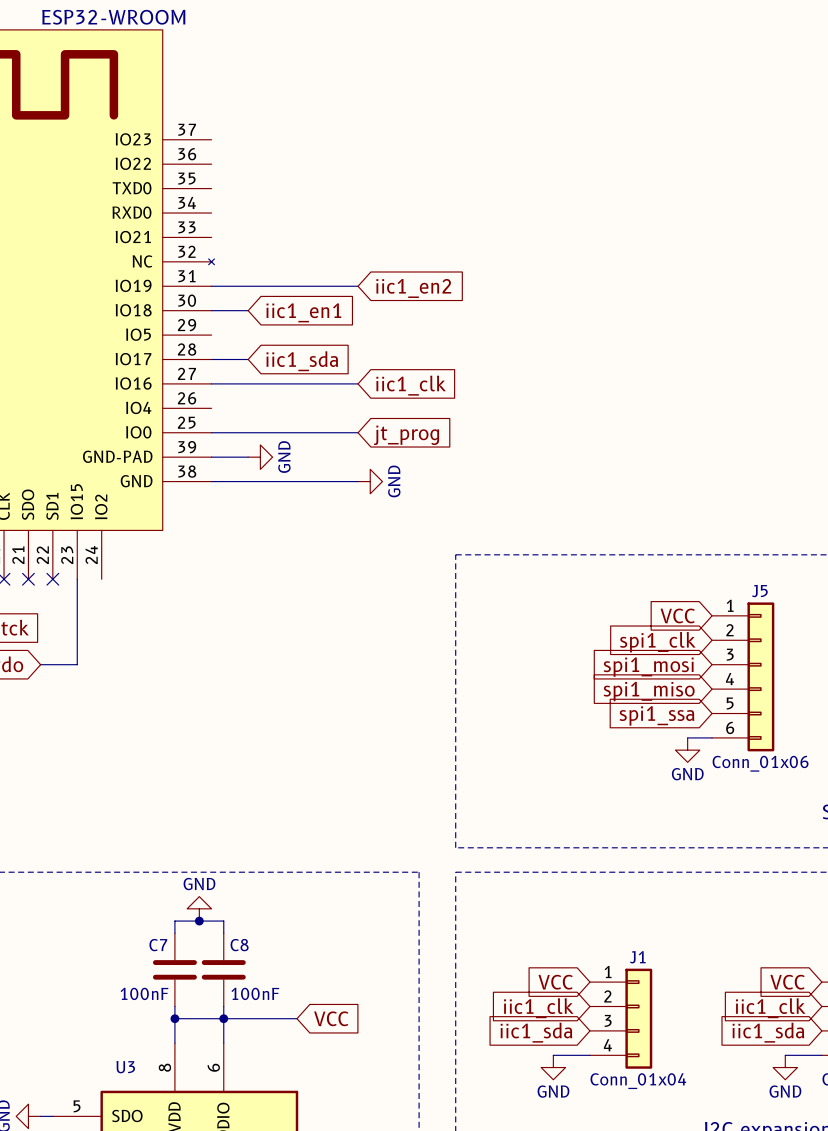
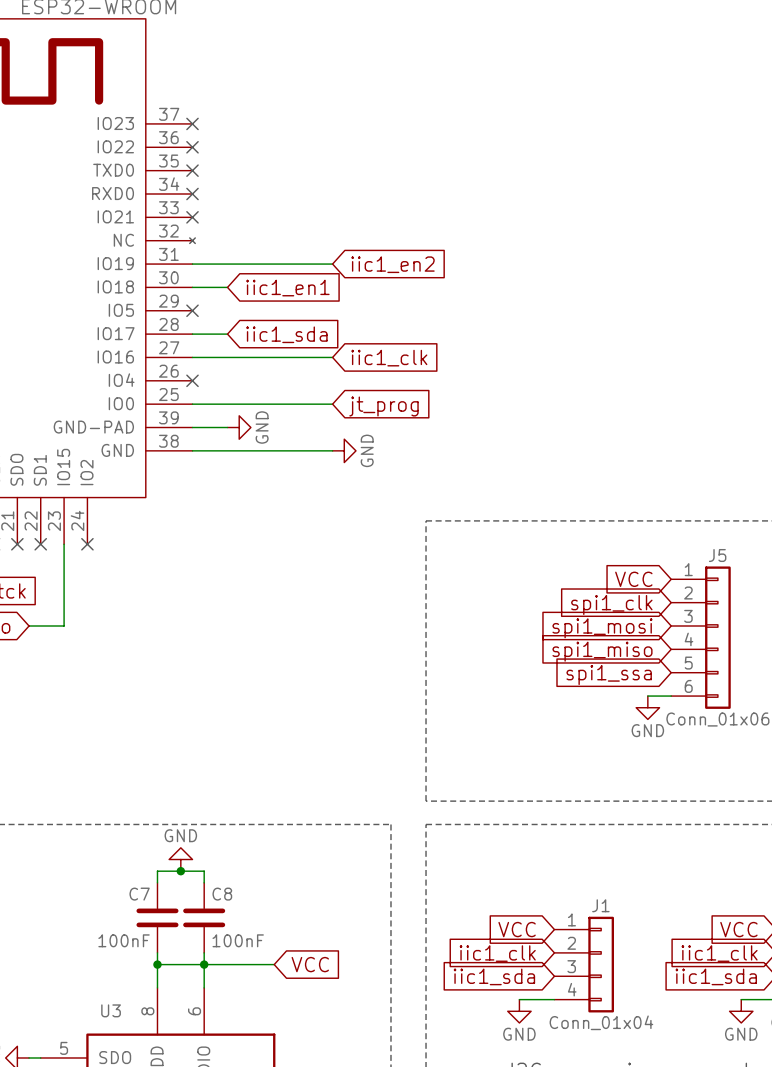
no-connect mark: none -> (192, 123)
no-connect mark: none -> (192, 147)
no-connect mark: none -> (192, 170)
no-connect mark: none -> (192, 194)
no-connect mark: none -> (192, 217)
no-connect mark: none -> (192, 310)
no-connect mark: none -> (192, 380)
no-connect mark: none -> (87, 544)

